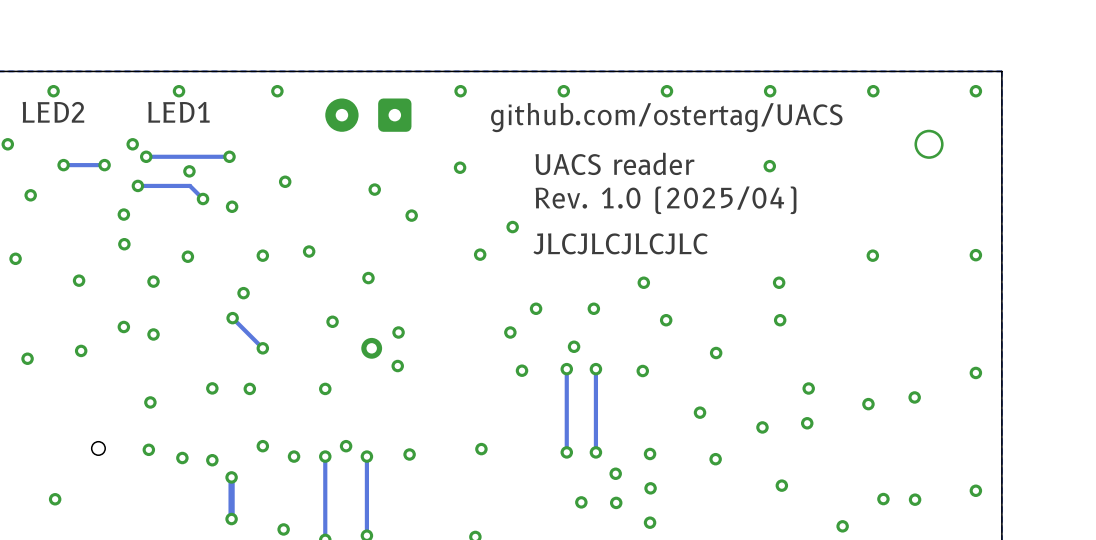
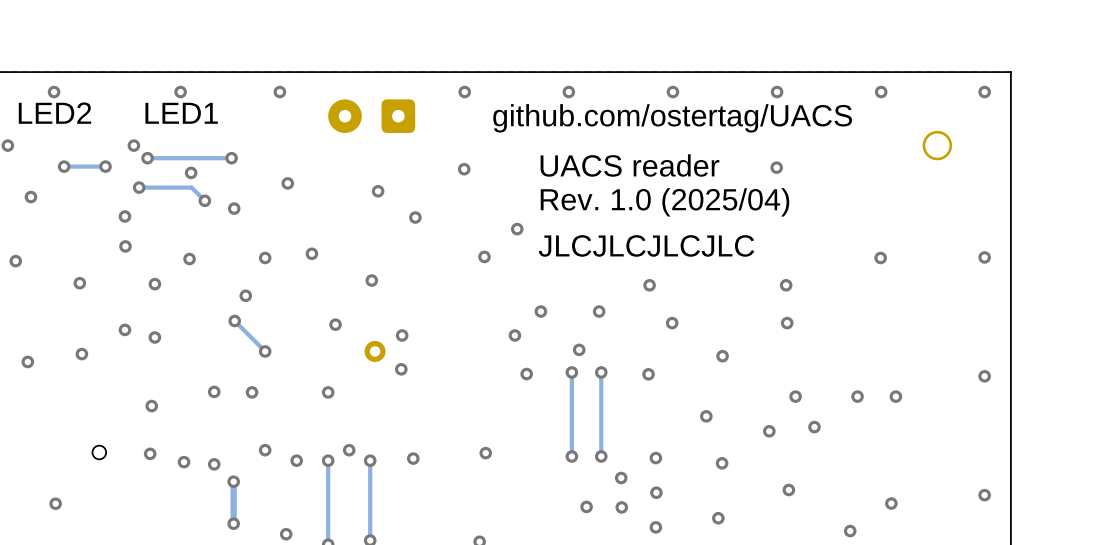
via: (808, 388) -> none
via: none -> (795, 396)
via: none -> (857, 396)
via: none -> (895, 396)
via: (914, 397) -> none
via: (868, 404) -> none
via: (915, 499) -> none
via: none -> (718, 518)

